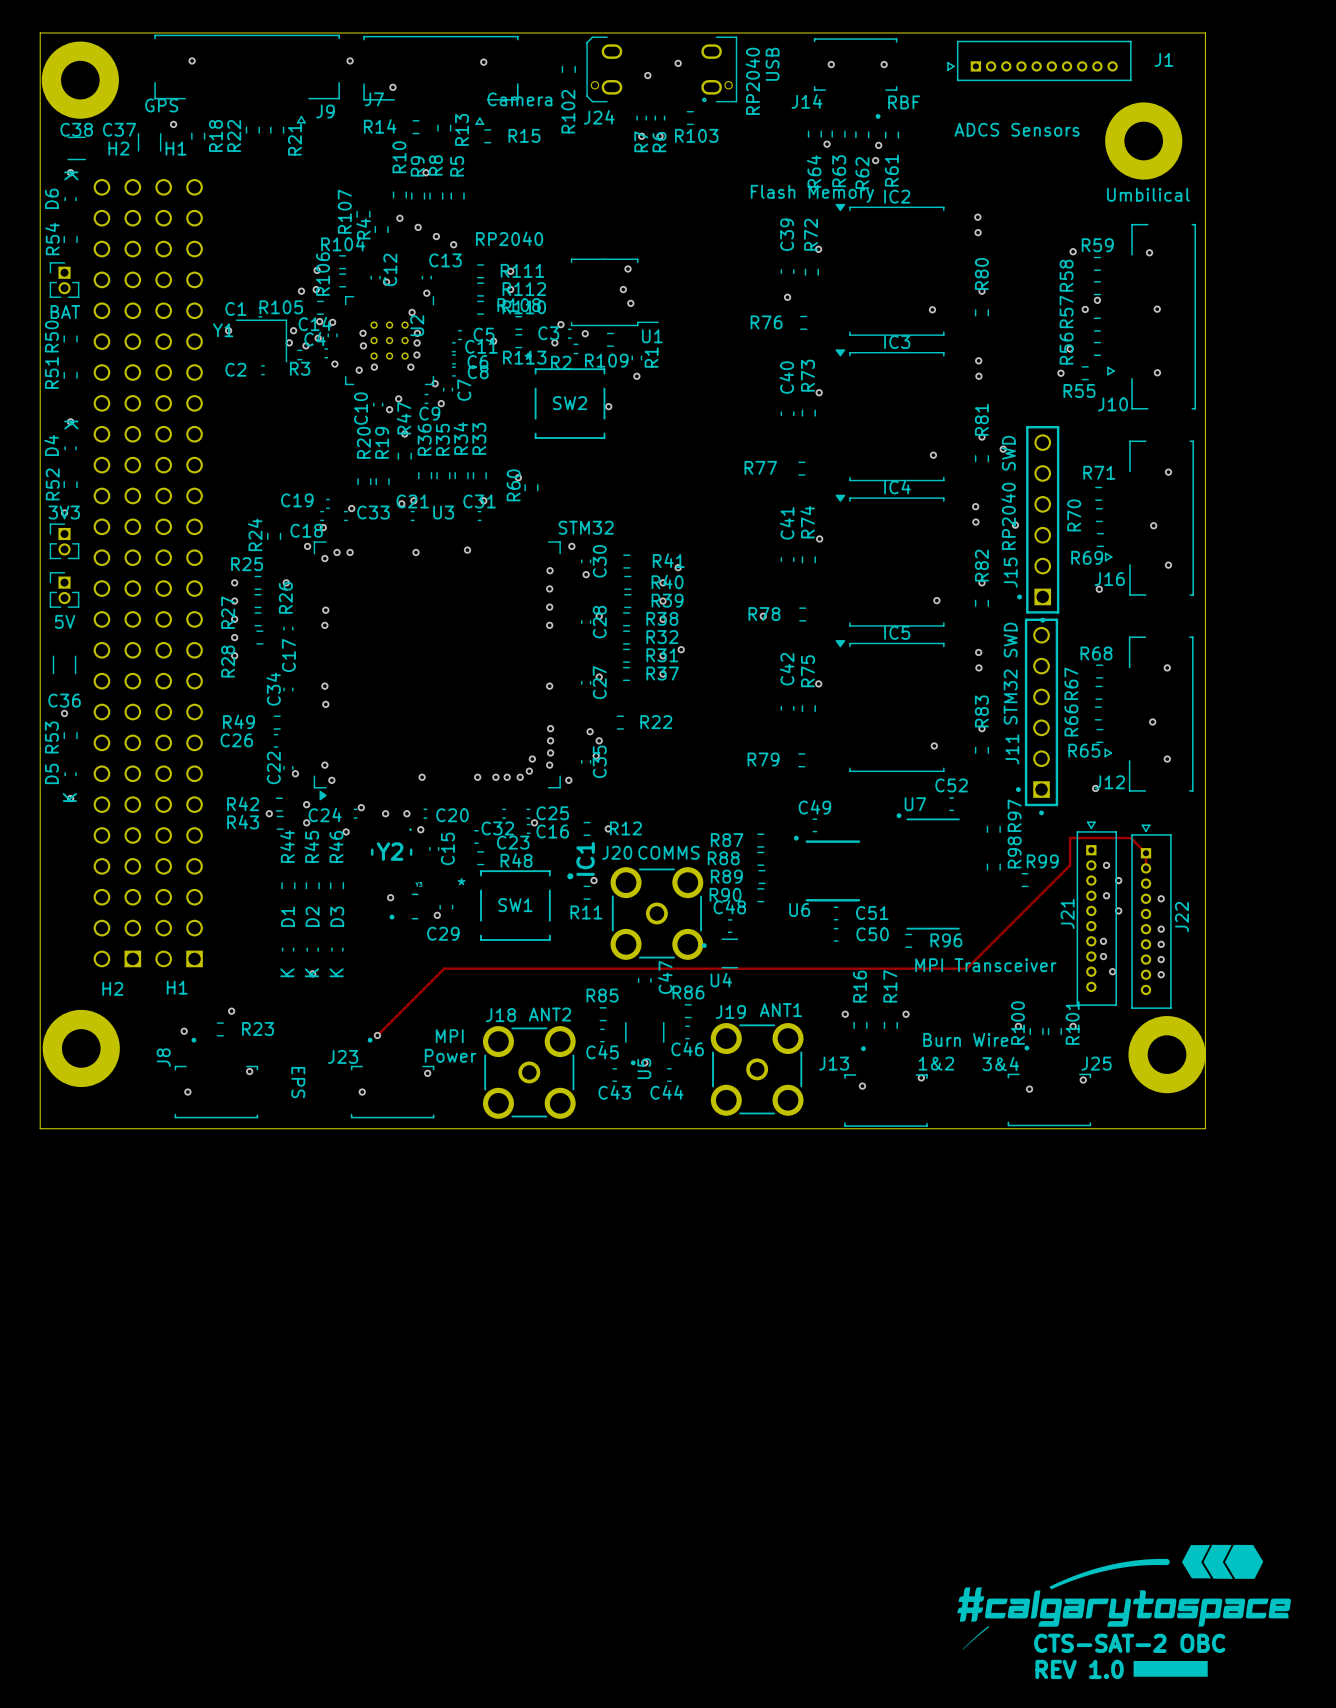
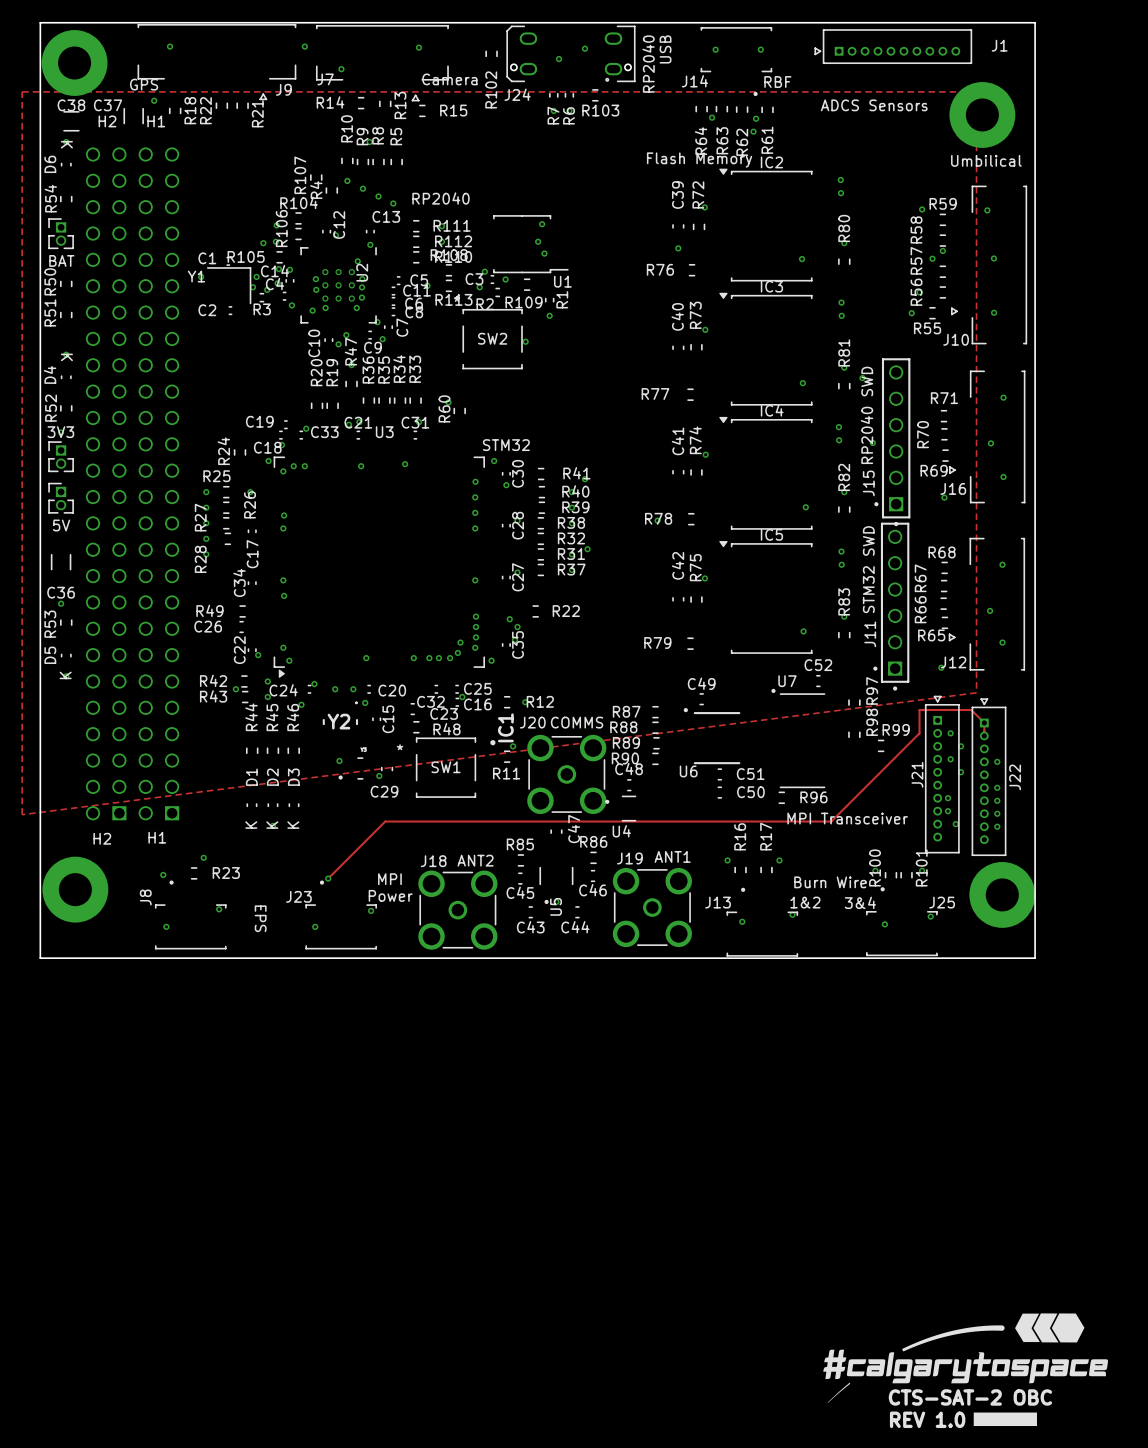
zone outline: none -> (22, 91) (976, 91) (976, 692) (22, 814) (22, 91)

